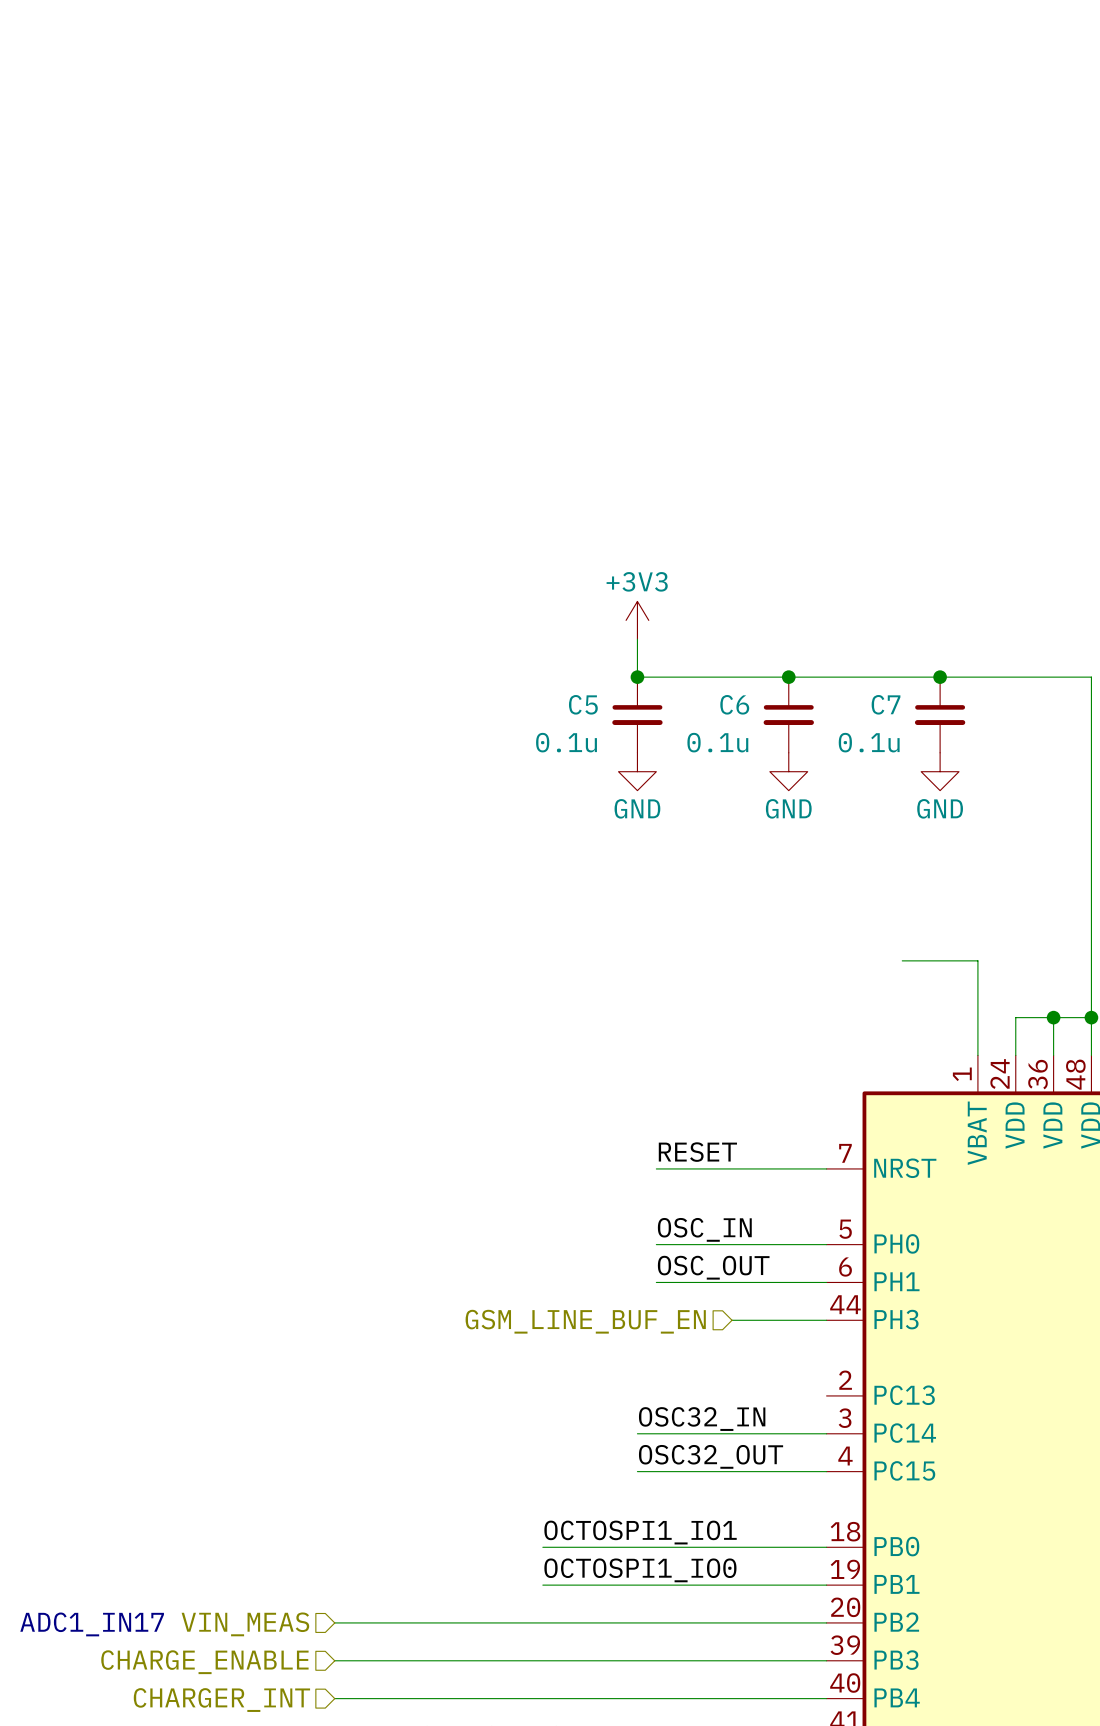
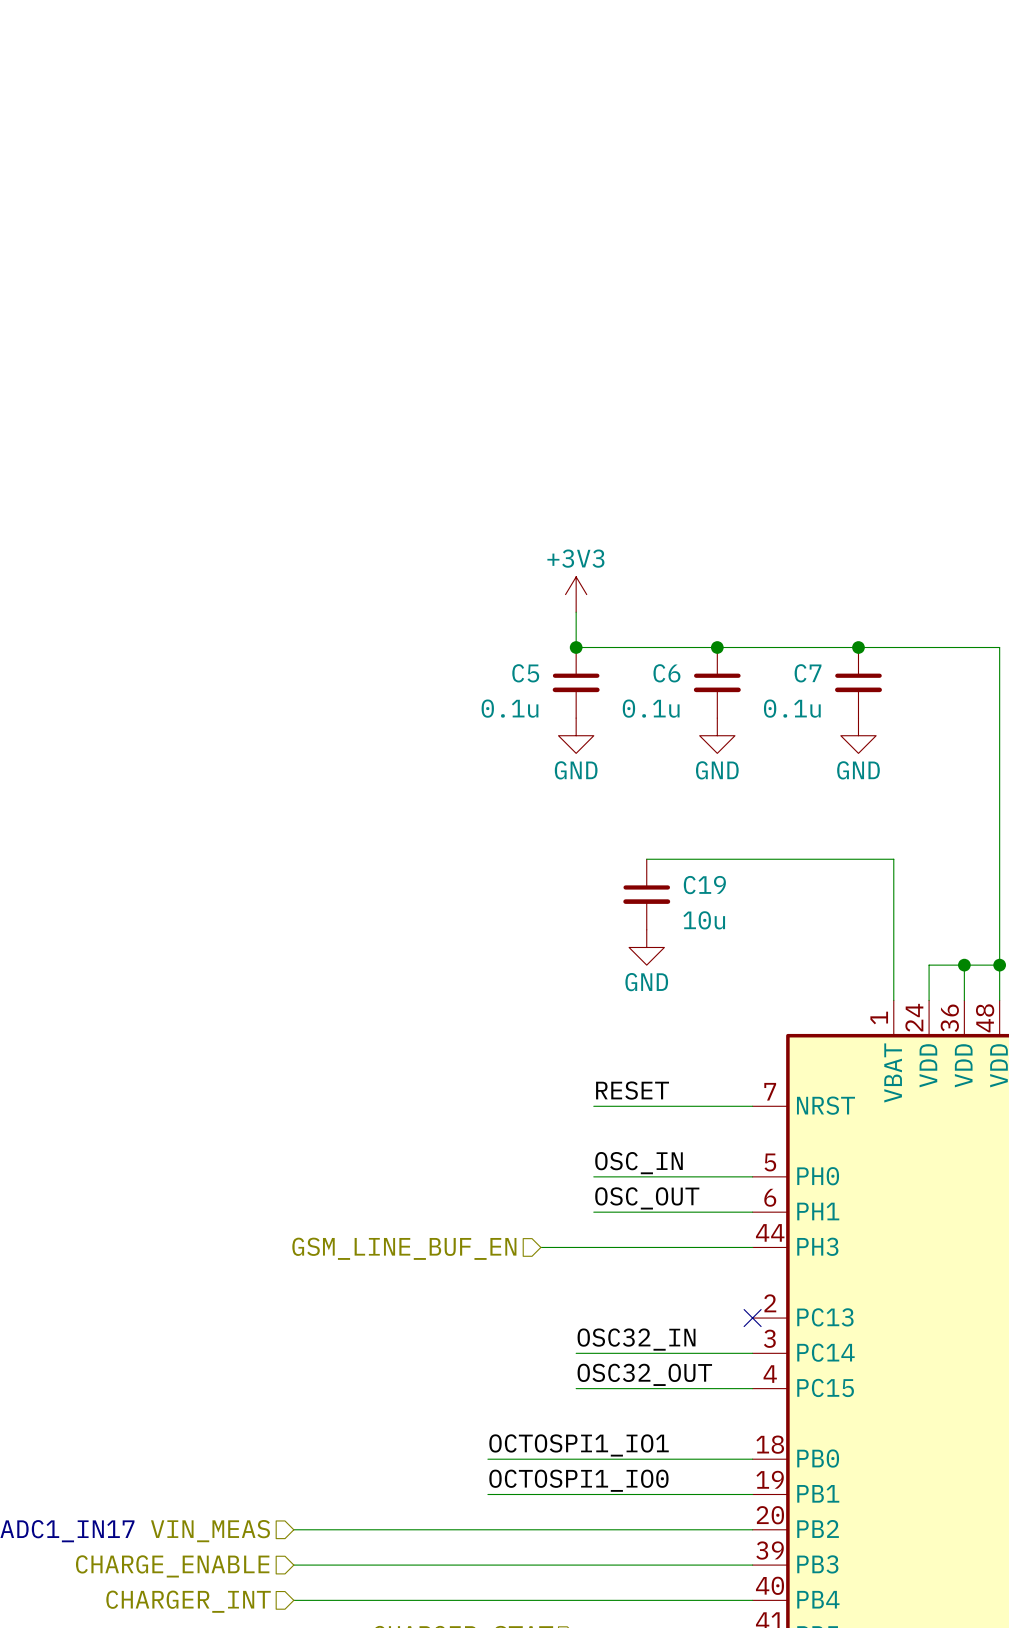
C19: none -> 10u (646, 894)
wire: (902, 960) (977, 960) -> (646, 859) (893, 859) (893, 912)
power symbol: none -> GND (646, 947)
wire: none -> (540, 1247) (664, 1247)
hierarchical label position: GSM_LINE_BUF_EN (585, 1321) -> GSM_LINE_BUF_EN (404, 1248)
no-connect mark: none -> (752, 1318)

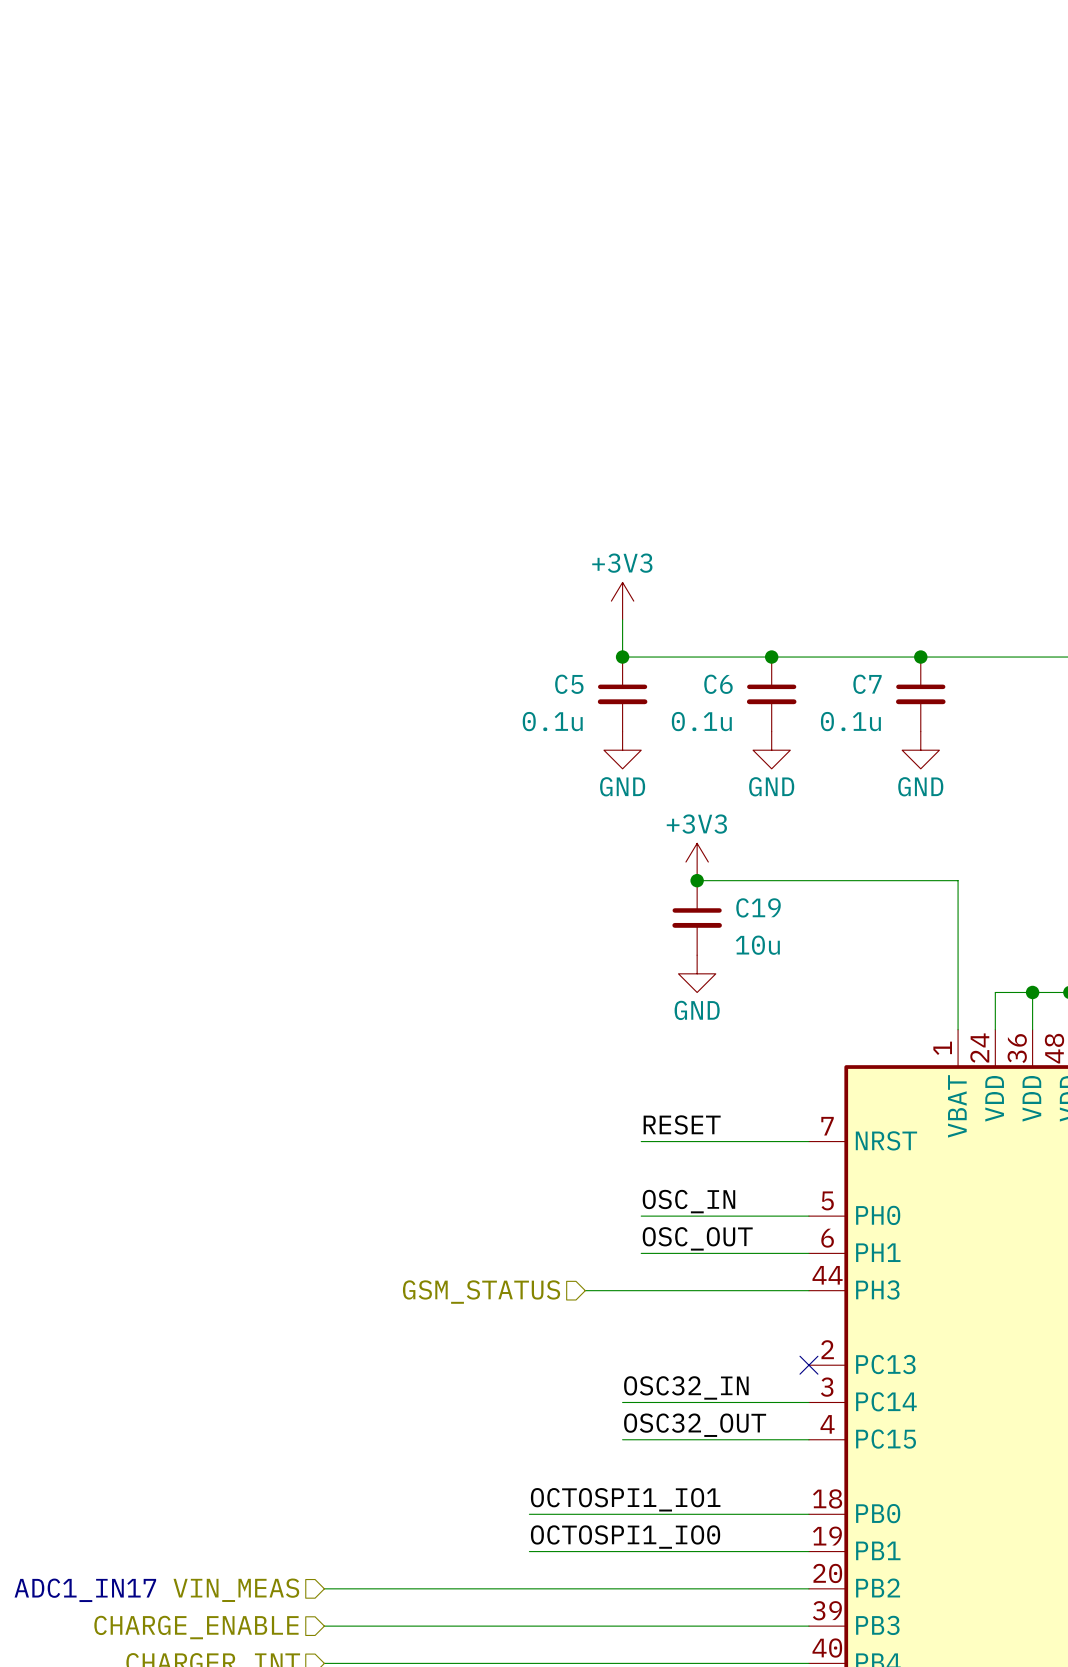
power symbol: none -> +3V3 (697, 862)
junction: none -> (697, 880)
hierarchical label: GSM_LINE_BUF_EN (404, 1248) -> GSM_STATUS (481, 1292)

